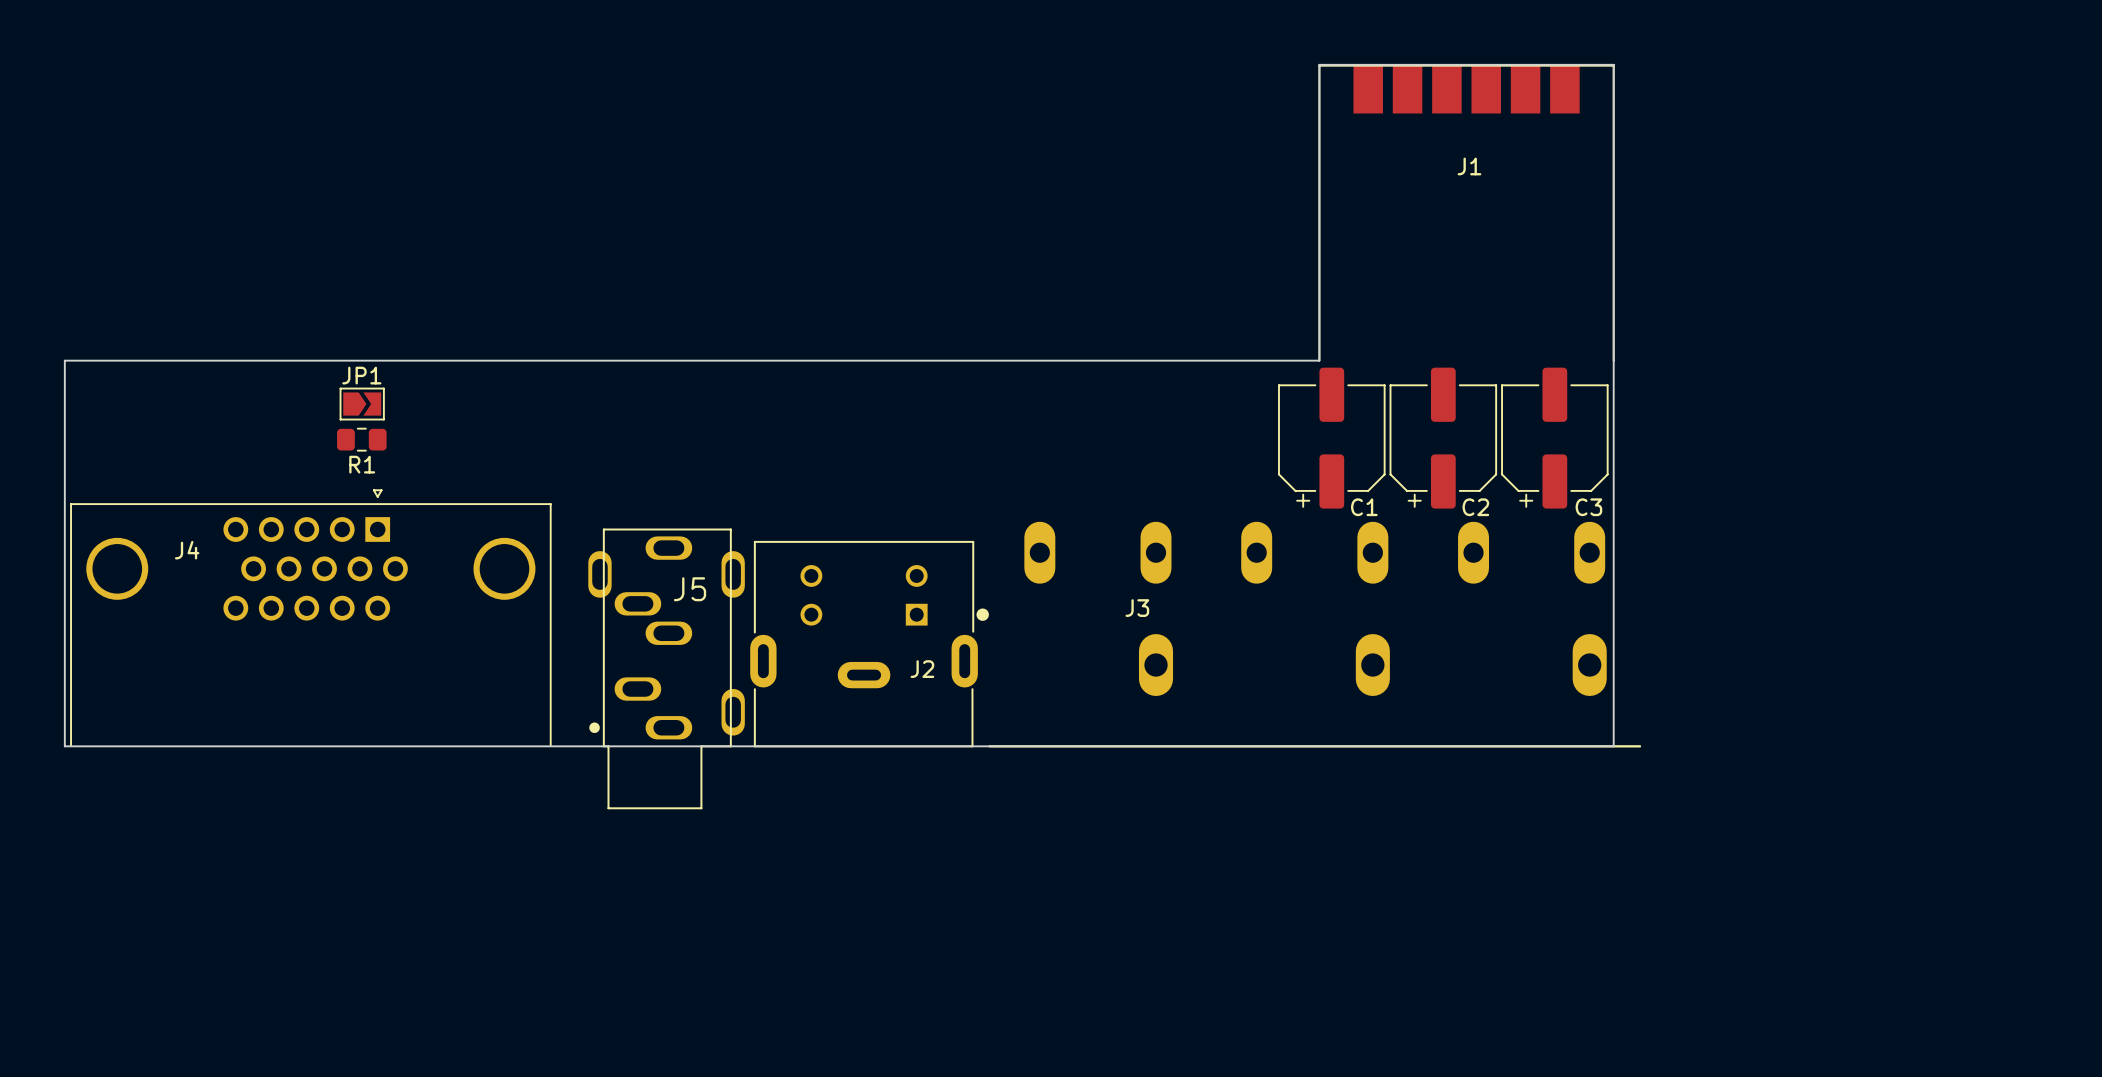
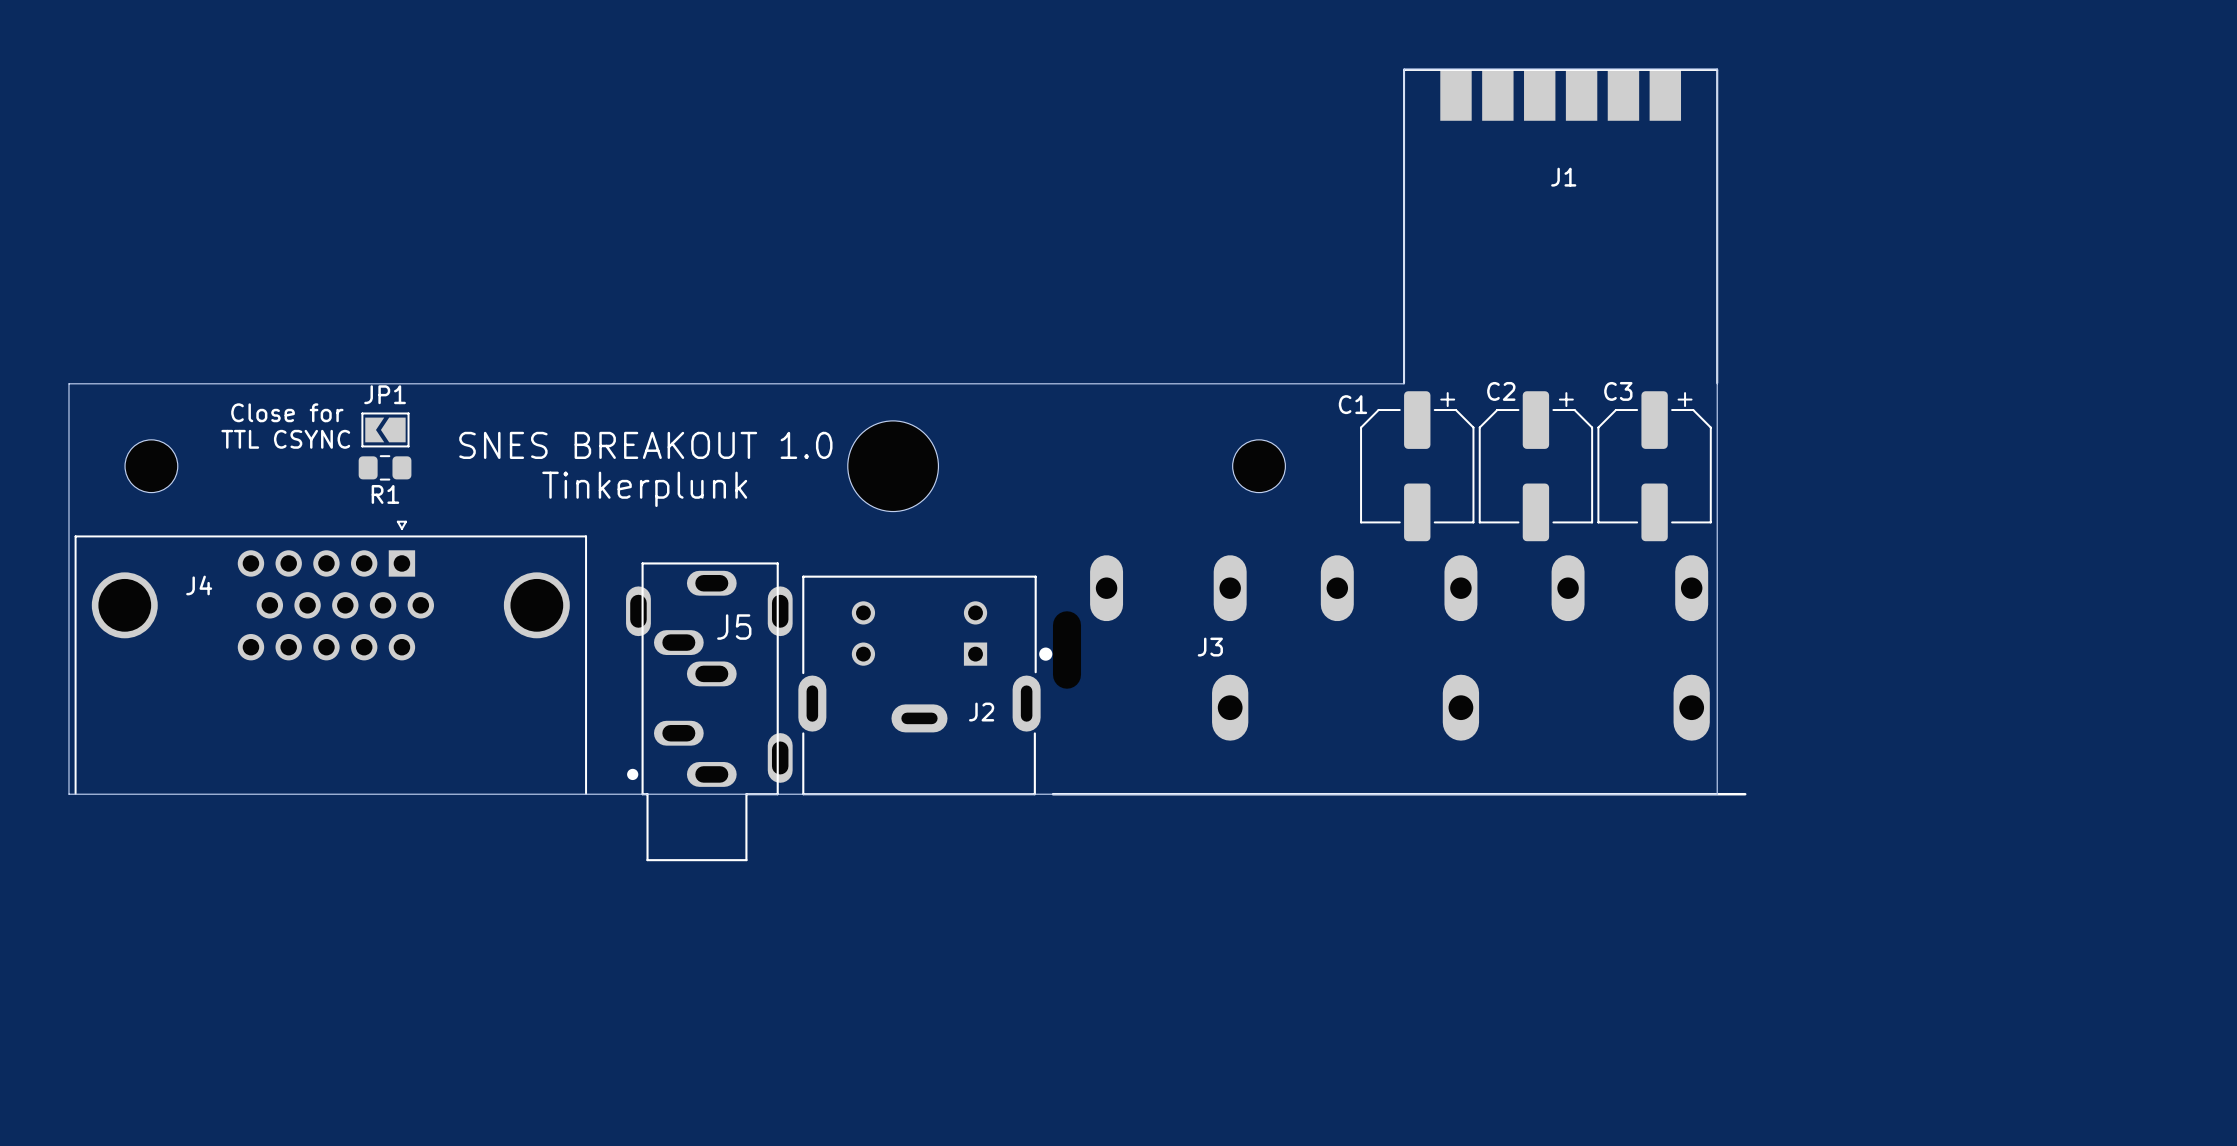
text: none -> Close for (287, 412)
JP1 rotation: 0° (362, 404) -> 180° (385, 429)
text: none -> TTL CSYNC (285, 439)
text: none -> SNES BREAKOUT 1.0 (645, 445)
part: none -> (151, 466)
part: none -> (893, 466)
part: none -> (1259, 466)
C1 rotation: 0° (1331, 438) -> 180° (1417, 466)
C2 rotation: 0° (1443, 438) -> 180° (1535, 466)
C3 rotation: 0° (1554, 438) -> 180° (1654, 466)
text: none -> Tinkerplunk (644, 489)

